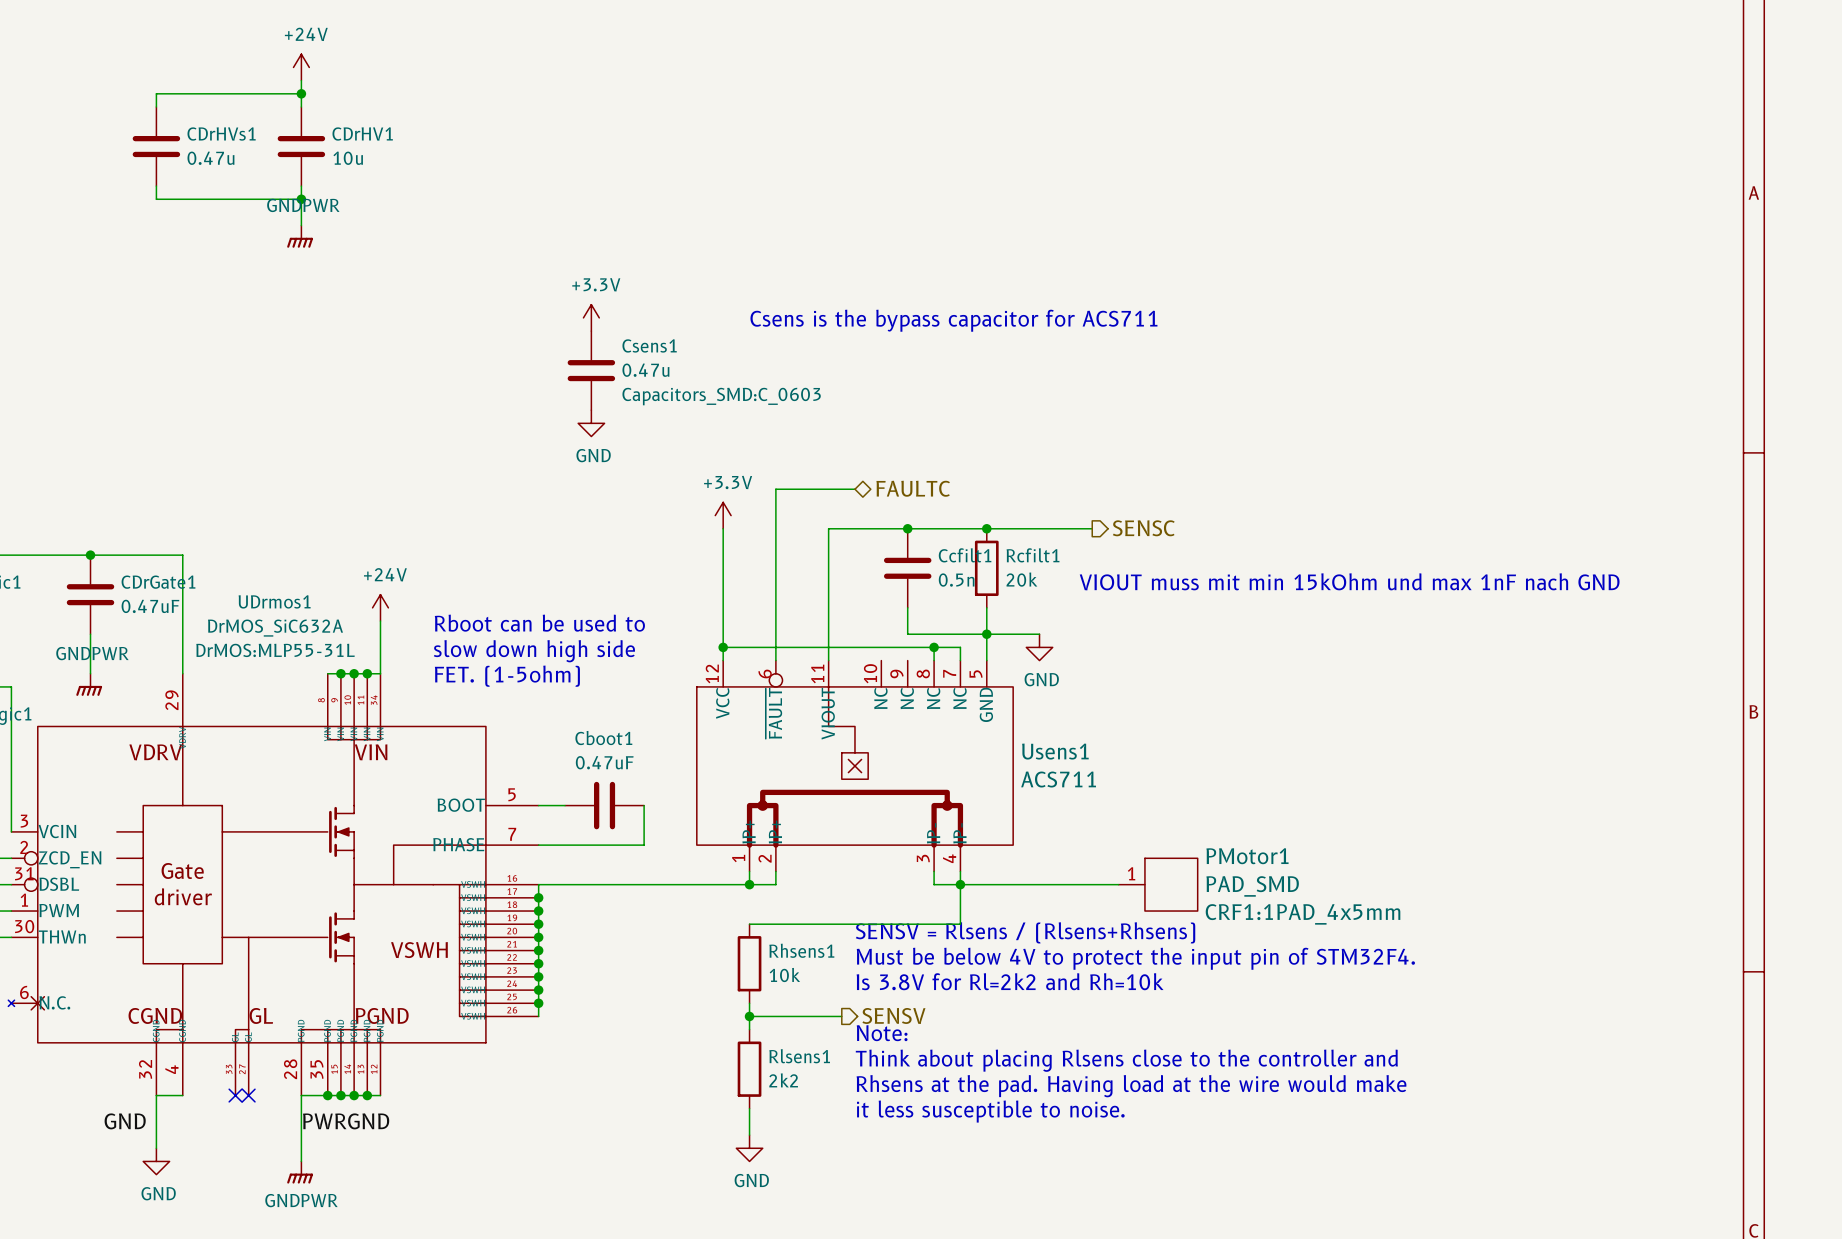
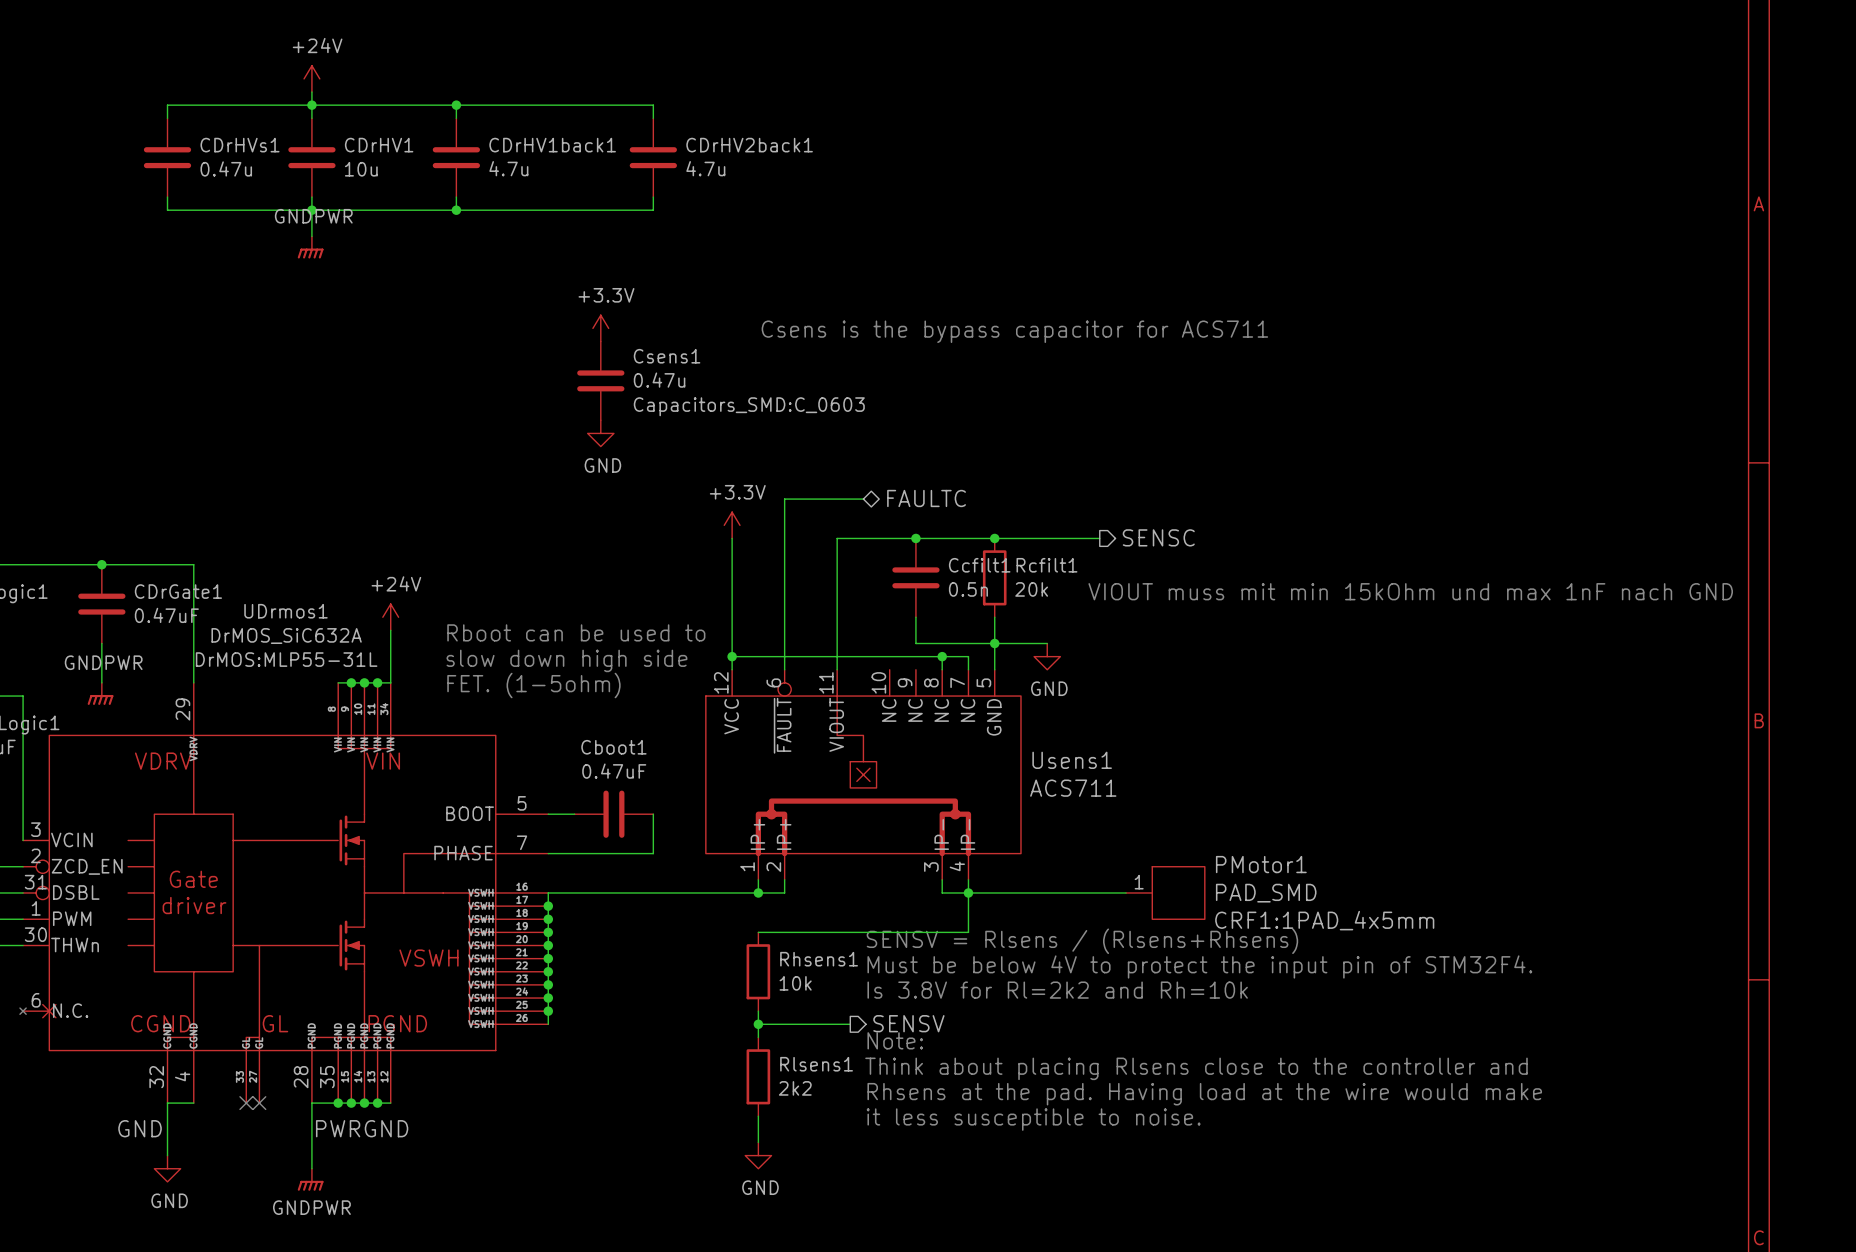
wire: none -> (311, 105) (653, 105) (653, 118)
wire: none -> (456, 105) (456, 118)
junction: none -> (456, 105)
CDrHV1back1: none -> 4.7u (456, 157)
CDrHV2back1: none -> 4.7u (653, 157)
wire: none -> (456, 197) (456, 210)
wire: none -> (653, 197) (653, 210) (311, 210)
junction: none -> (456, 210)

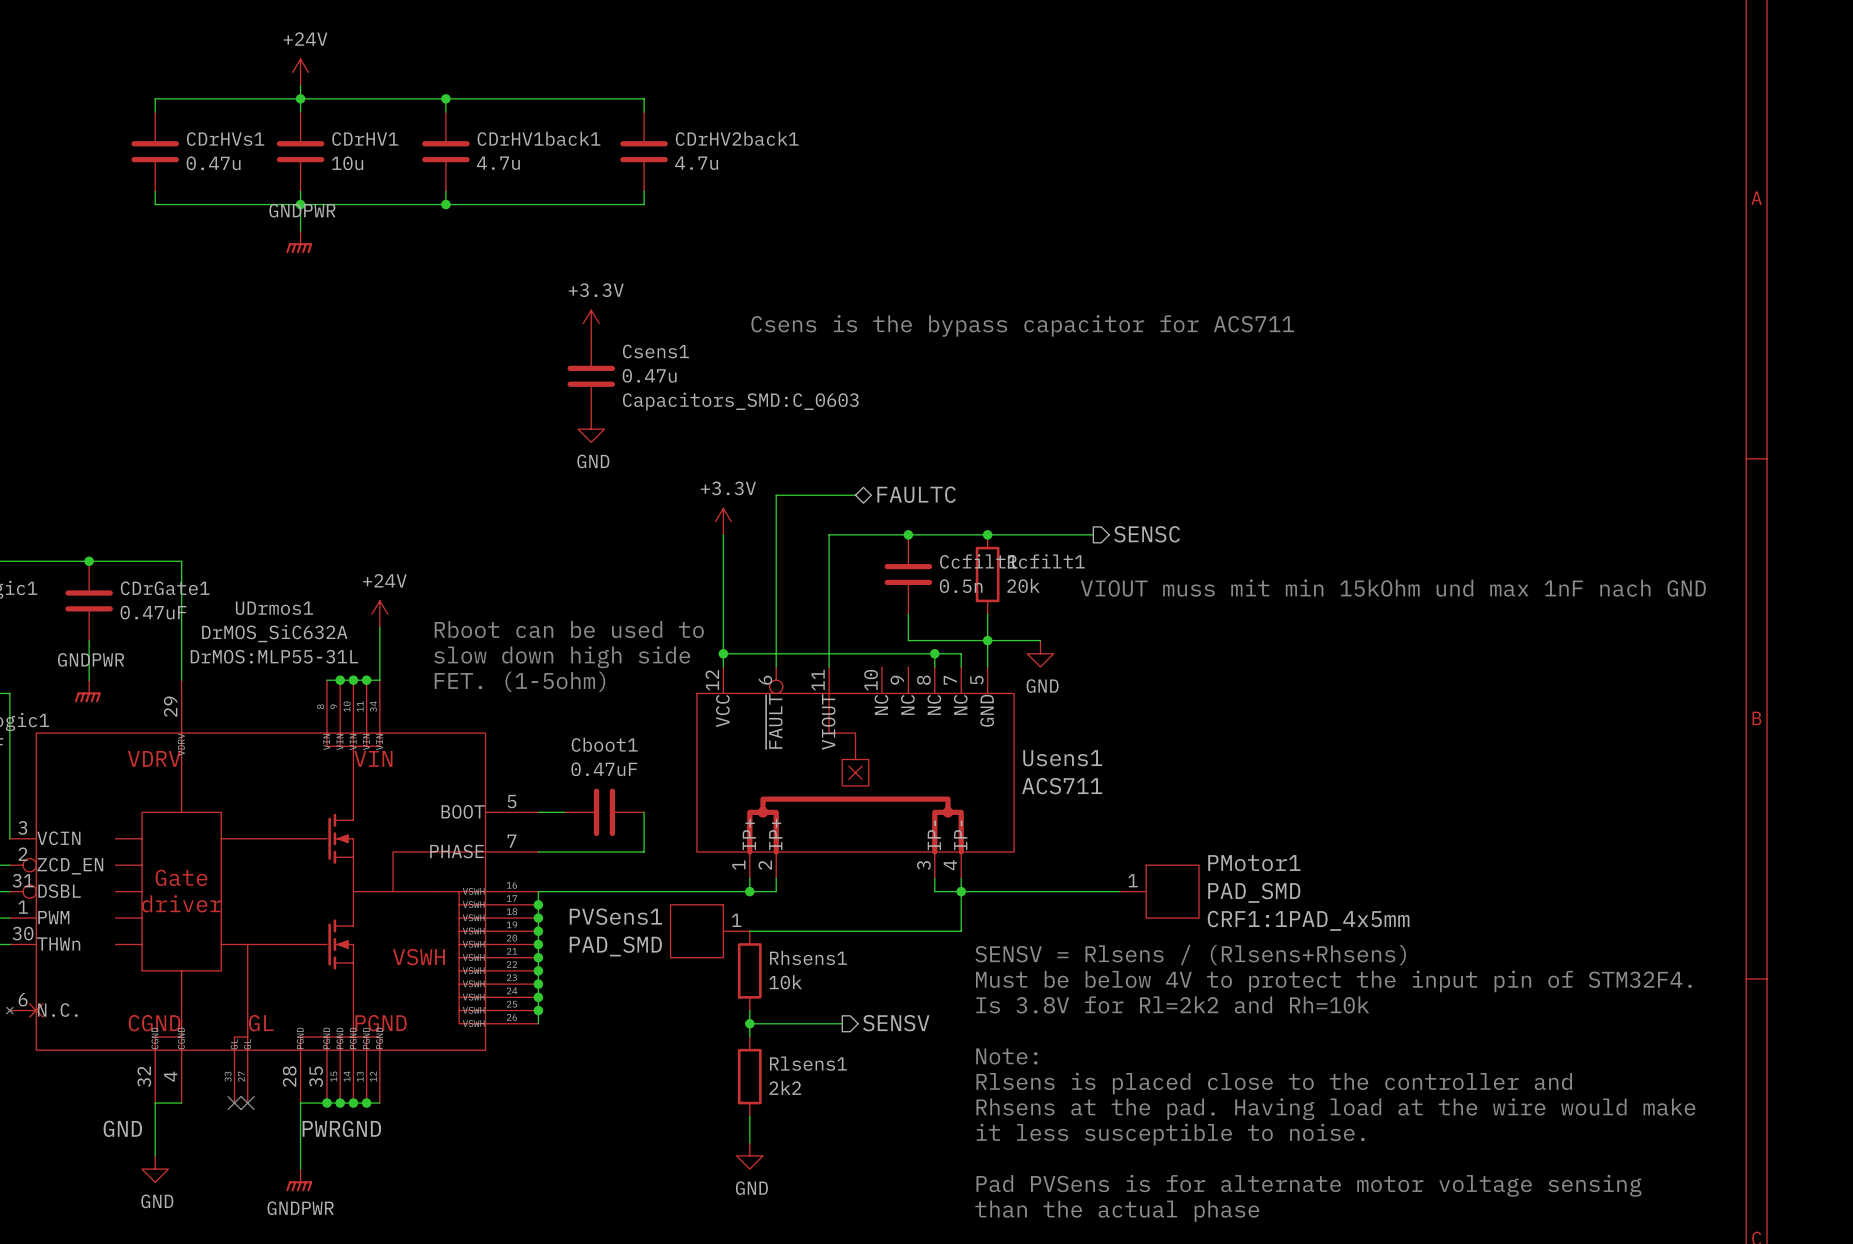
PVSens1: none -> PAD_SMD (710, 931)
text position: SENSV = Rlsens / (Rlsens+Rhsens) (1082, 941) -> SENSV = Rlsens / (Rlsens+Rhsens) (1190, 955)
text position: Must be below 4V to protect the input pin of STM32F4. (1199, 966) -> Must be below 4V to protect the input pin of STM32F4. (1333, 981)
text position: Is 3.8V for Rl=2k2 and Rh=10k (1057, 990) -> Is 3.8V for Rl=2k2 and Rh=10k (1172, 1004)
text position: Note: (895, 1040) -> Note: (1006, 1056)
text: Think about placing Rlsens close to the controller and (1196, 1068) -> Rlsens is placed close to the controller and (1274, 1083)
text position: Rhsens at the pad. Having load at the wire would make (1204, 1094) -> Rhsens at the pad. Having load at the wire would make (1335, 1109)
text position: it less susceptible to noise. (1033, 1119) -> it less susceptible to noise. (1170, 1134)
text: none -> Pad PVSens is for alternate motor voltage sensing (1308, 1185)
text: none -> than the actual phase (1117, 1211)

